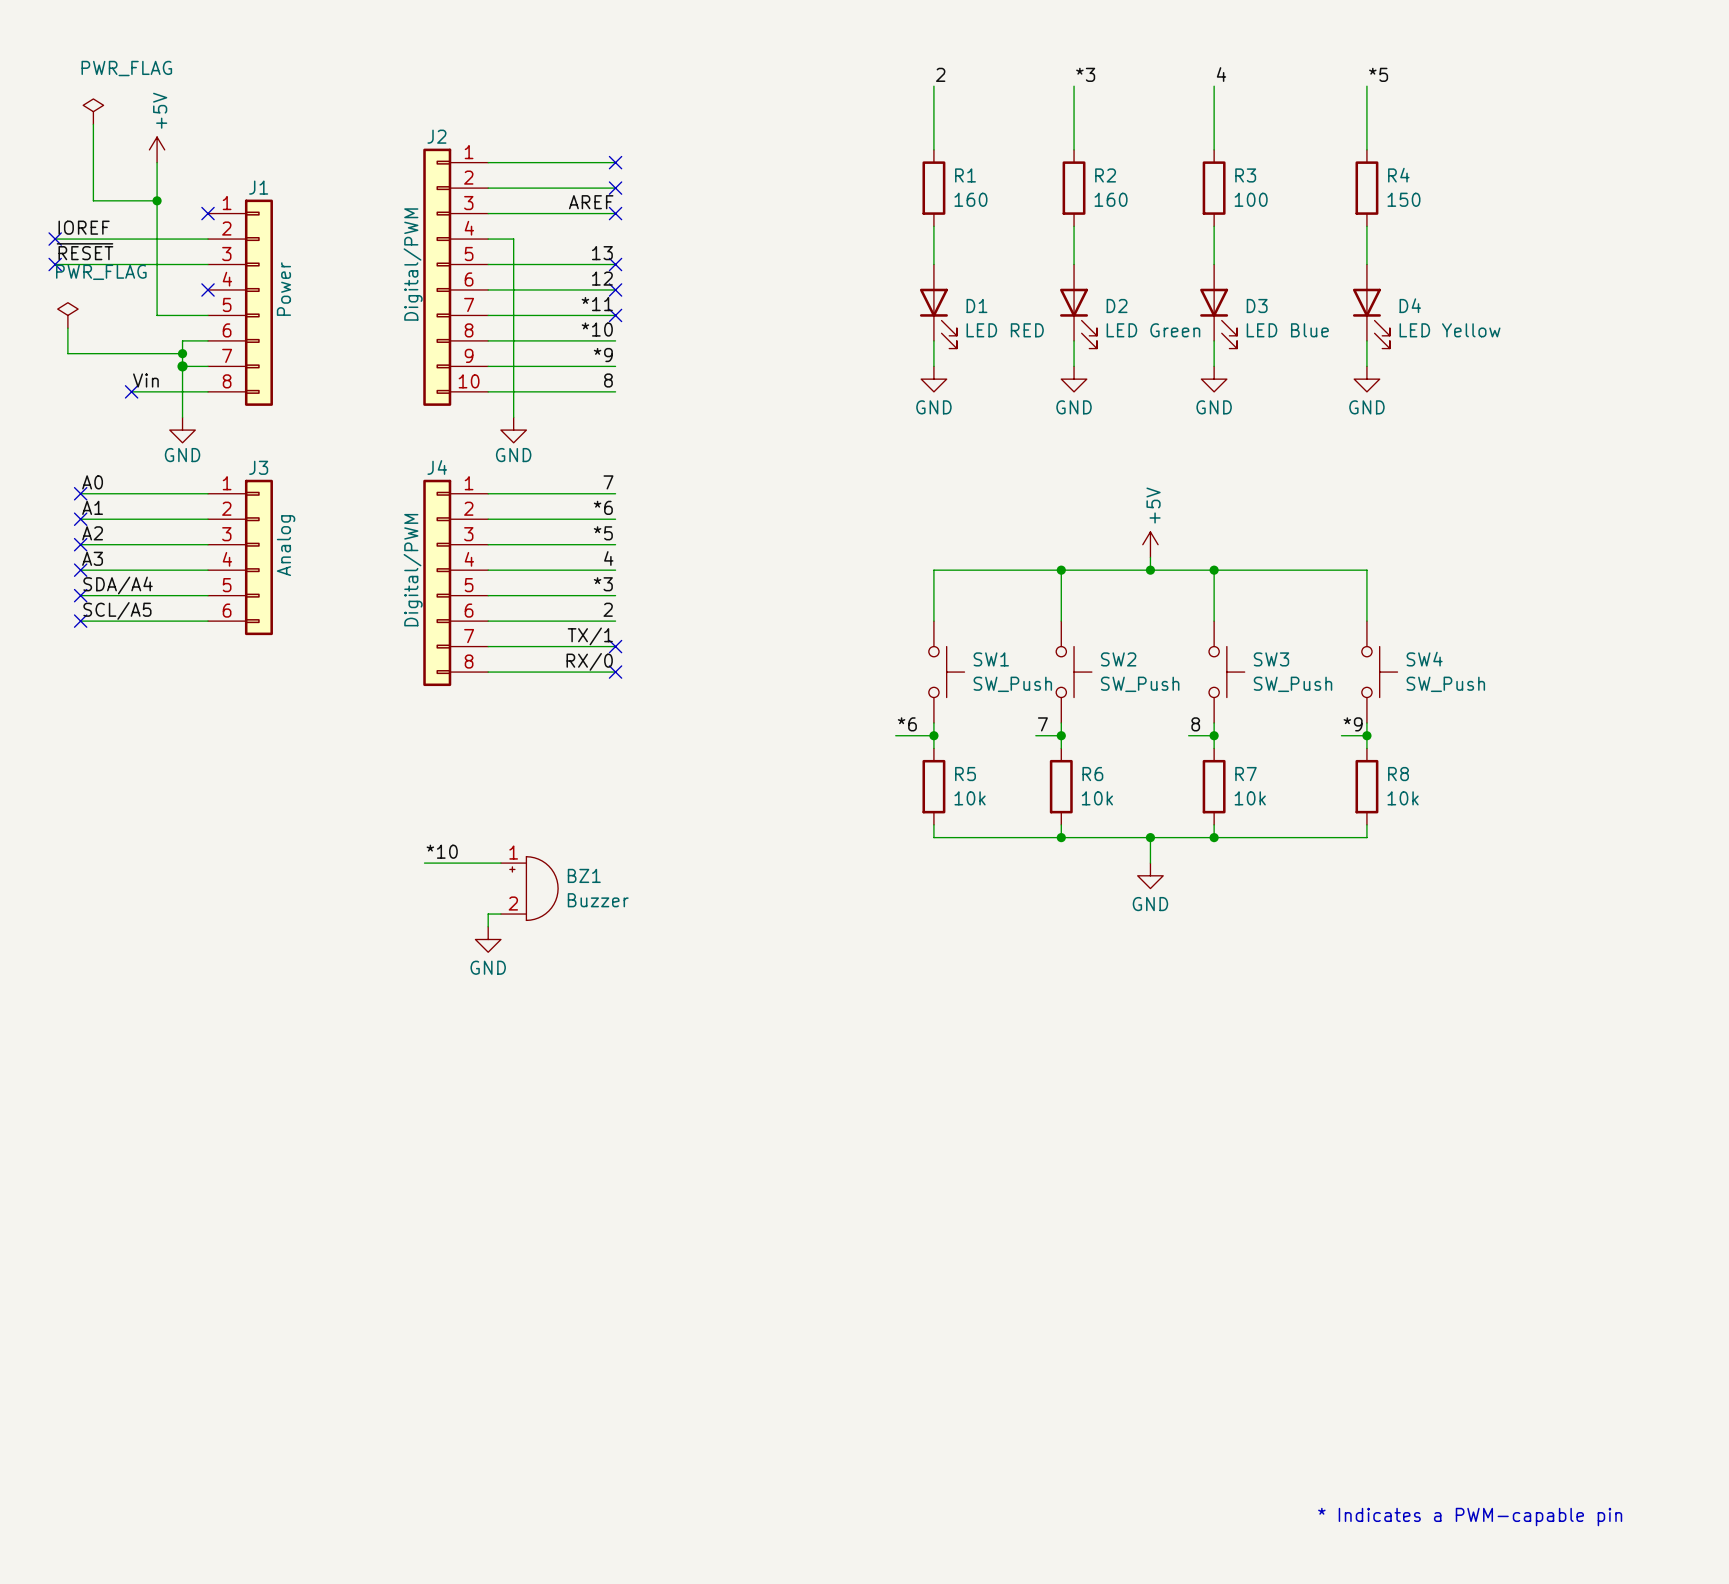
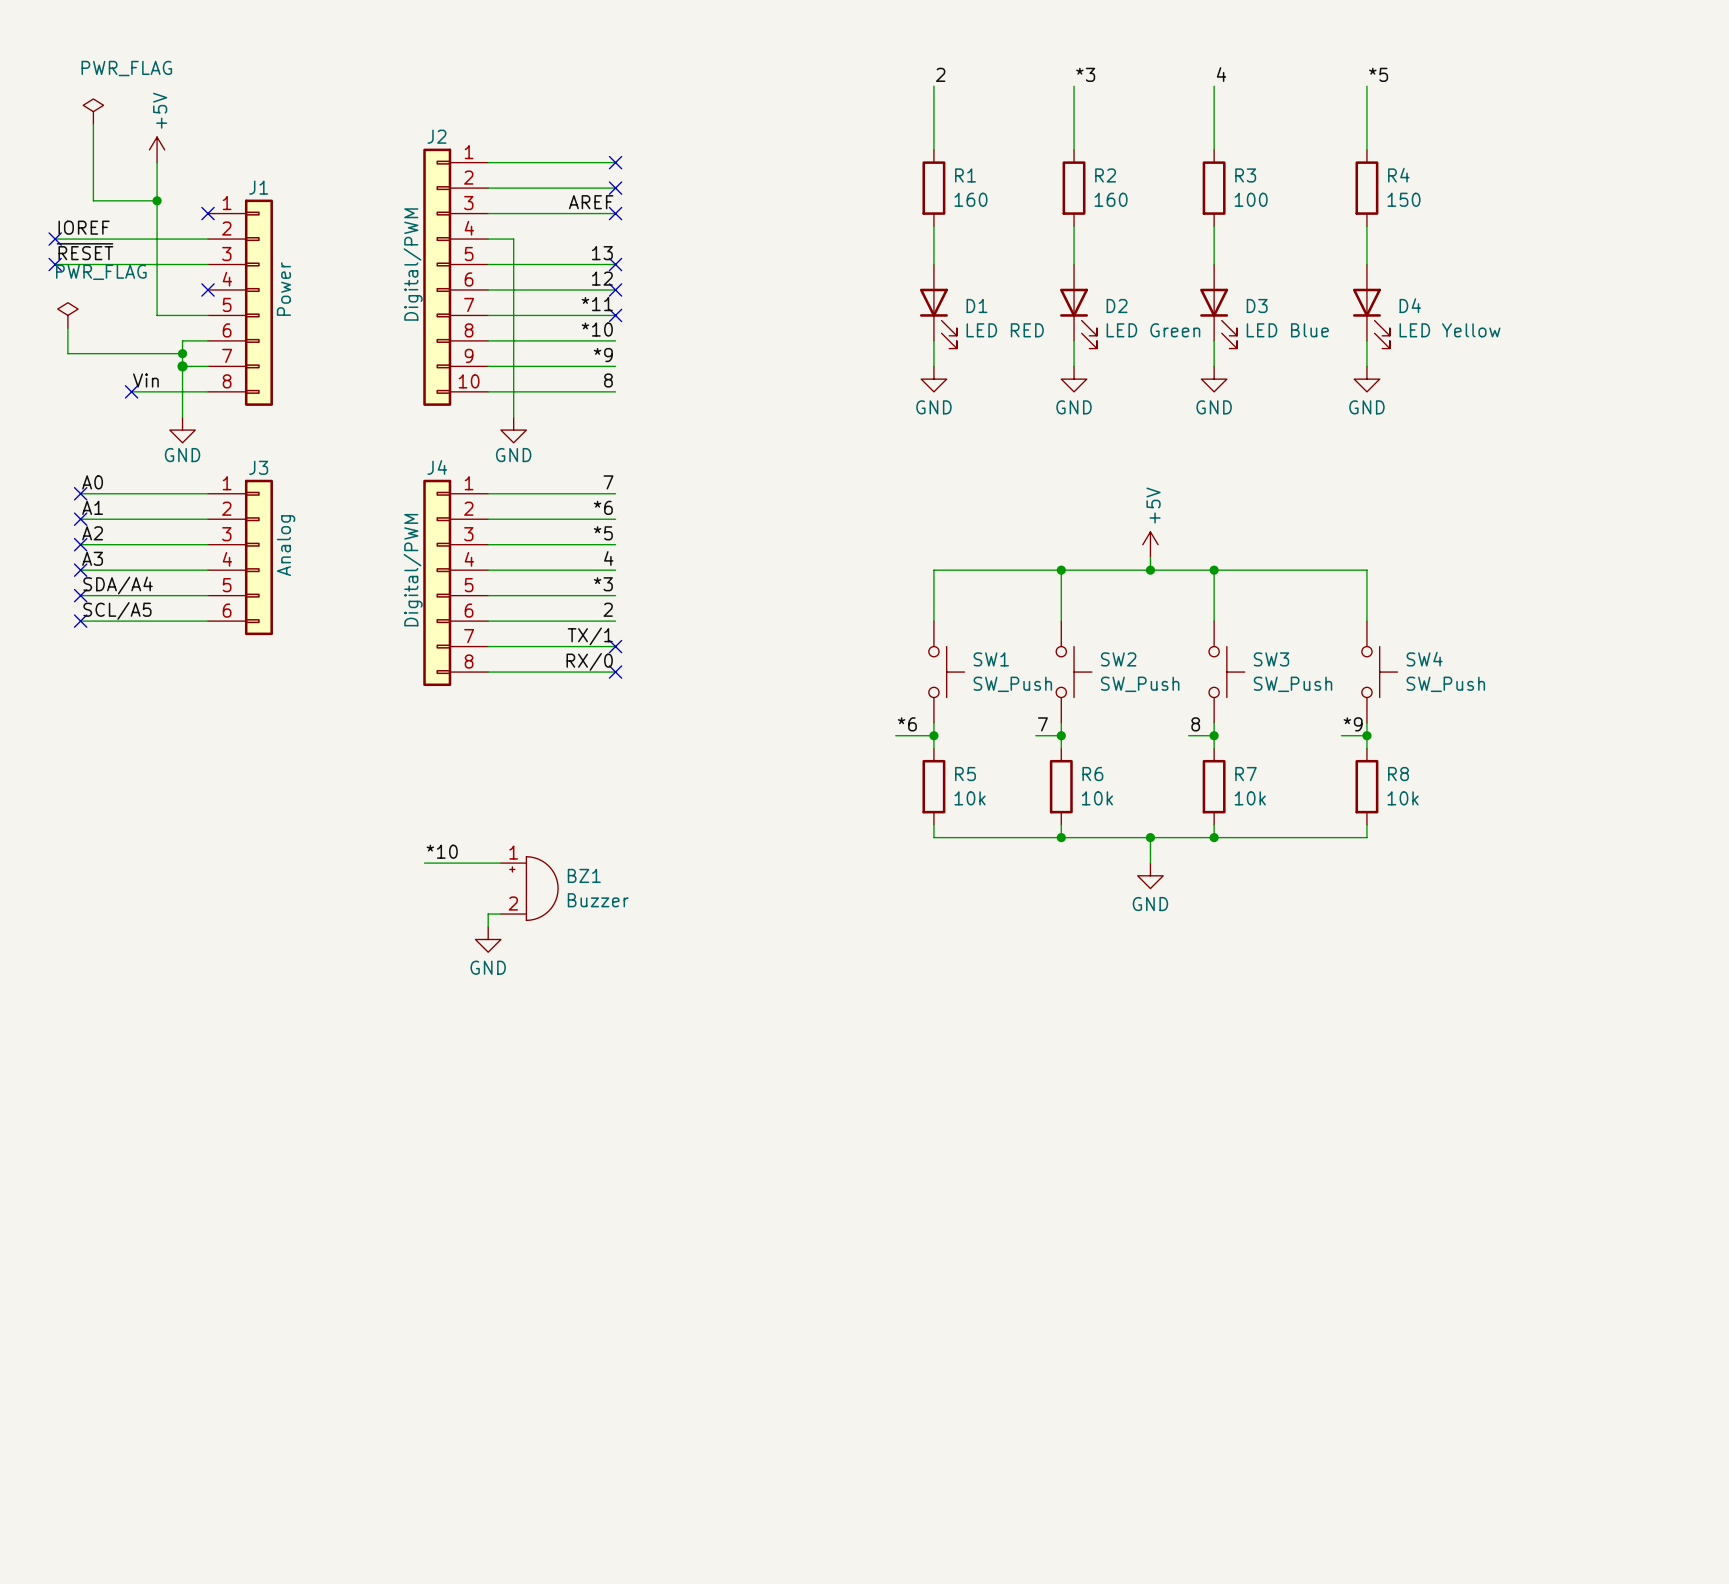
text: * Indicates a PWM-capable pin (1470, 1517) -> none

